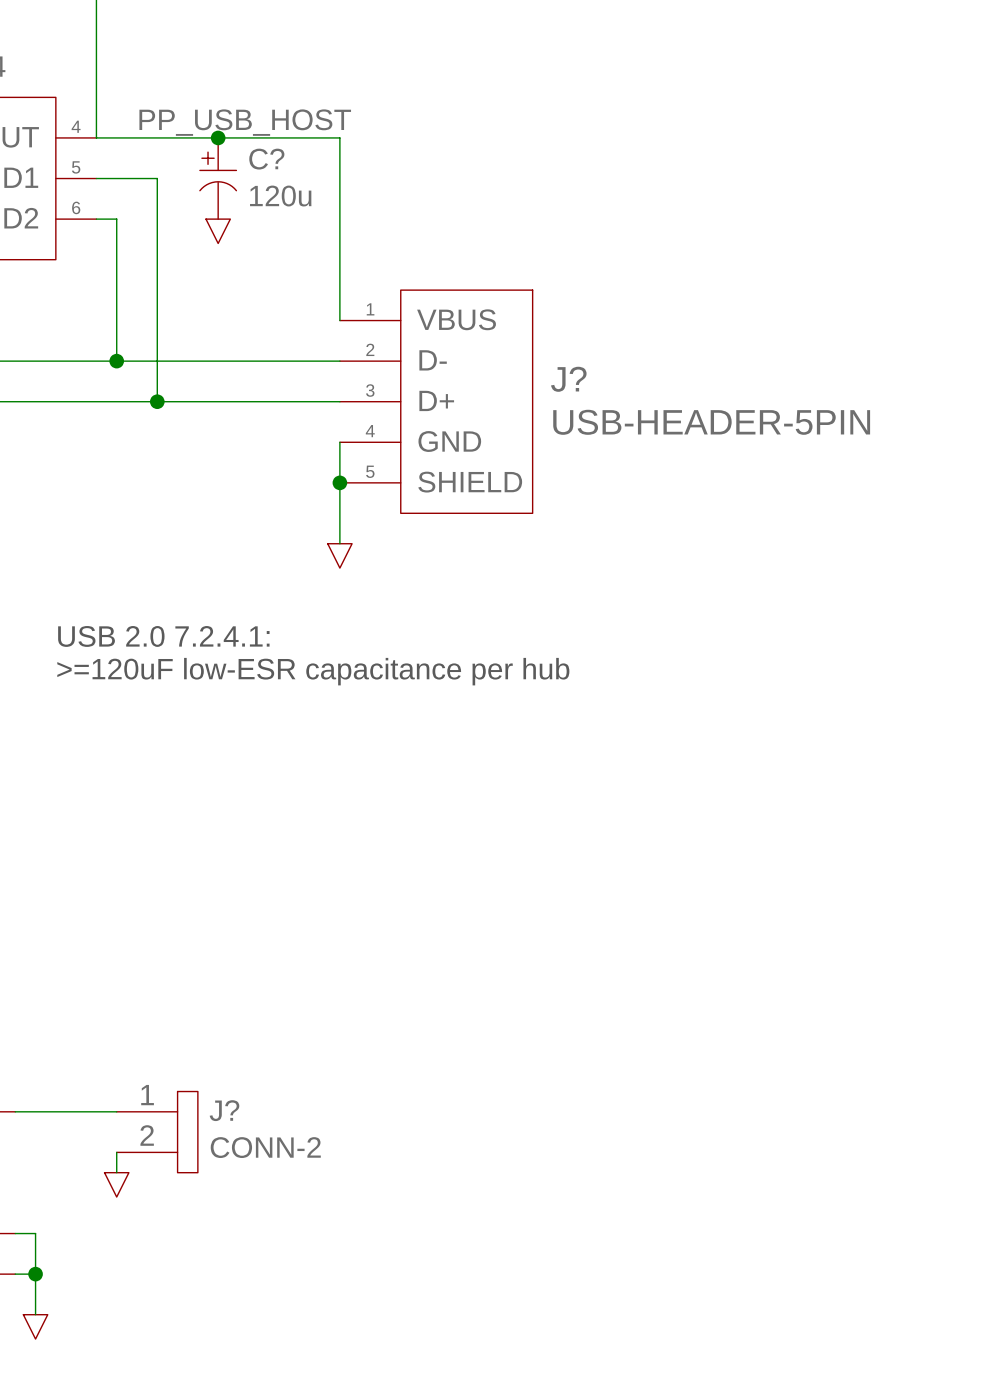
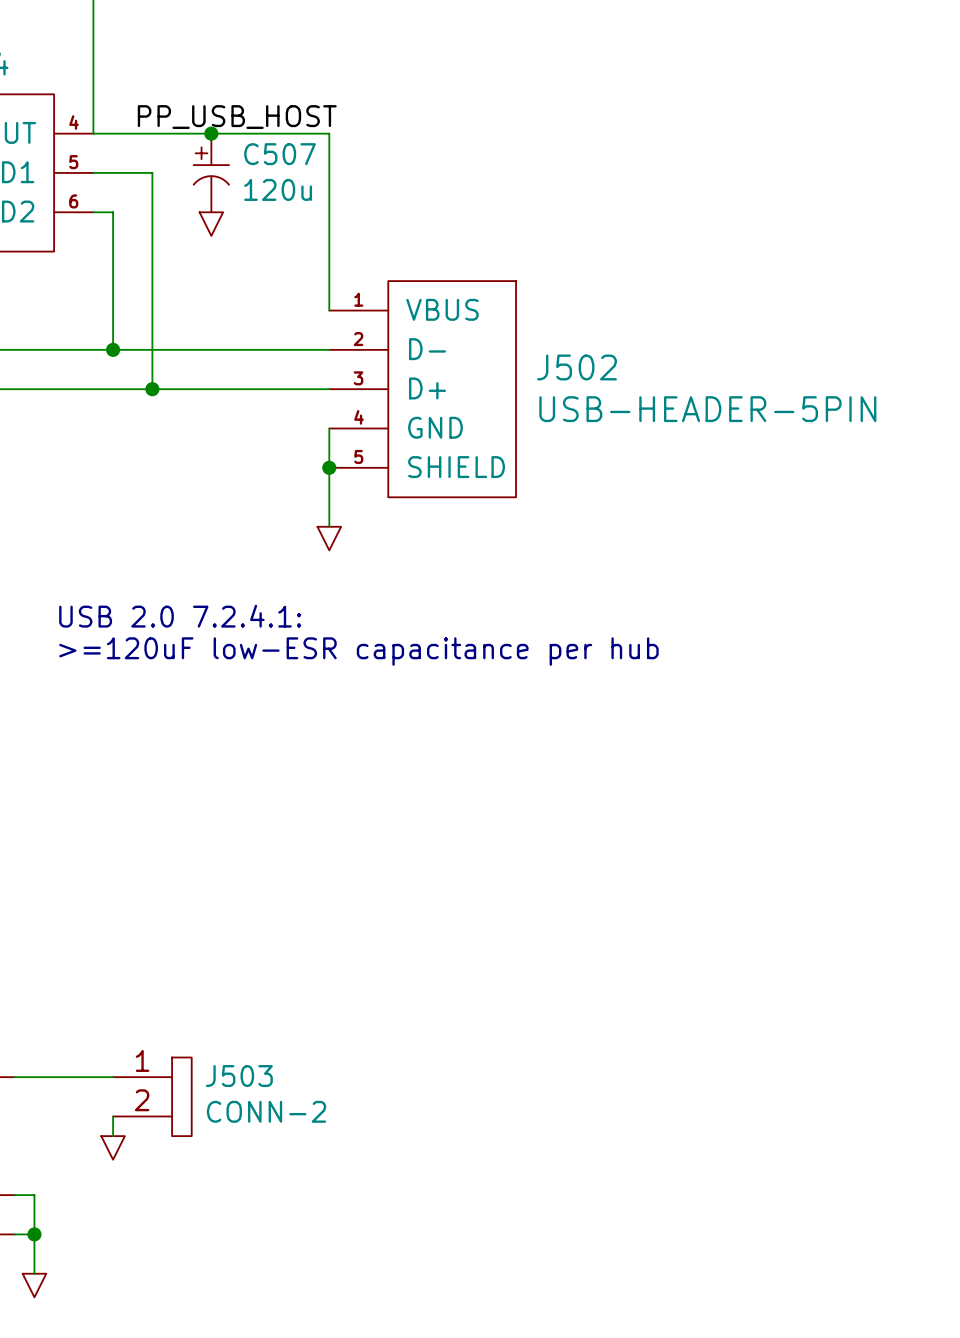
C? name: C? (266, 159) -> C507 (279, 154)
J? name: J? (568, 379) -> J502 (577, 367)
J? name: J? (224, 1110) -> J503 (239, 1076)

